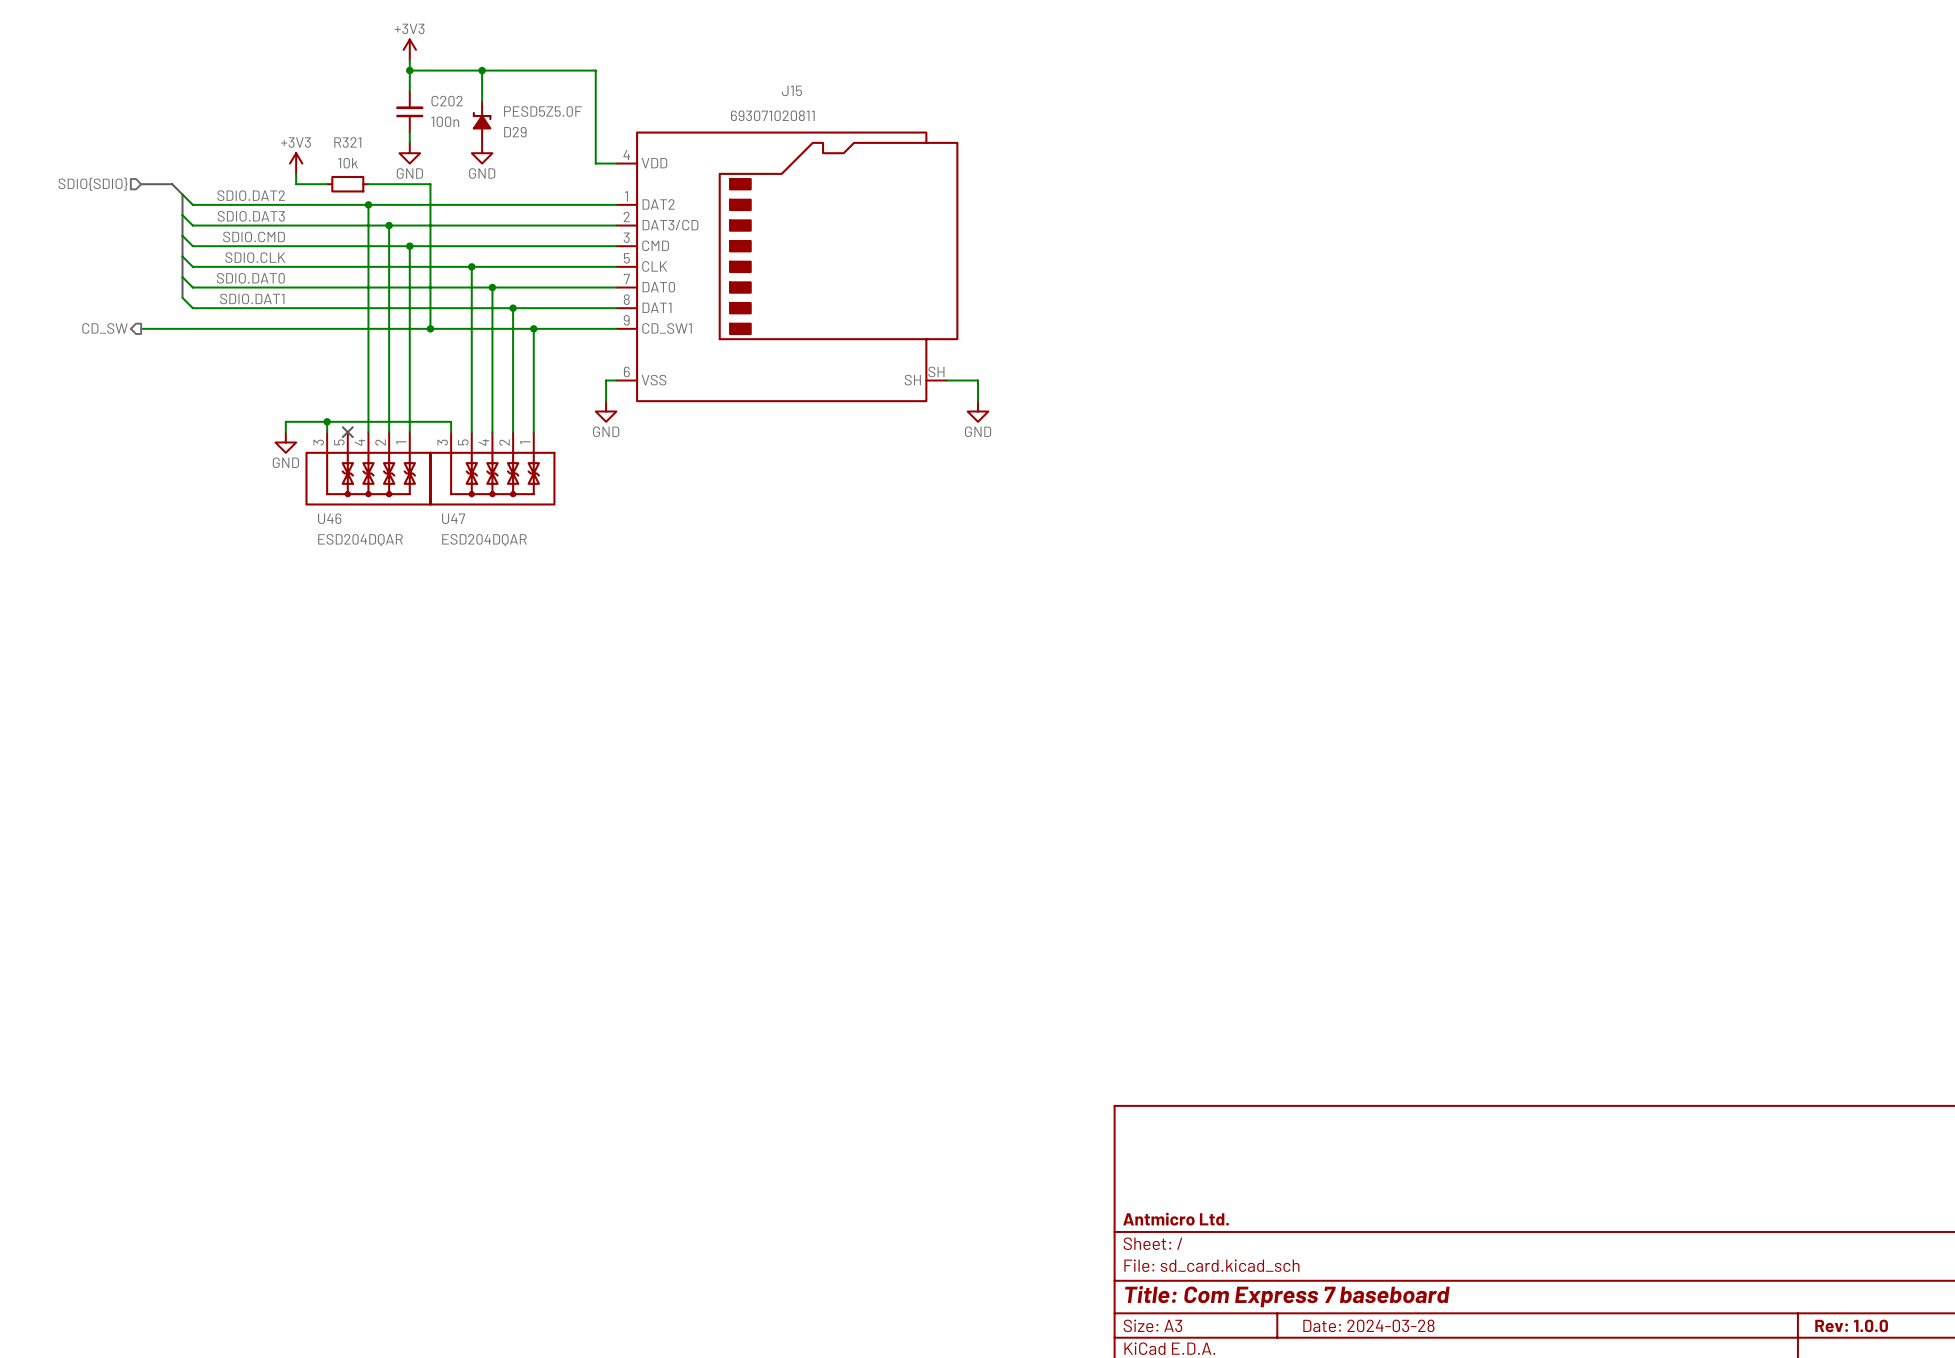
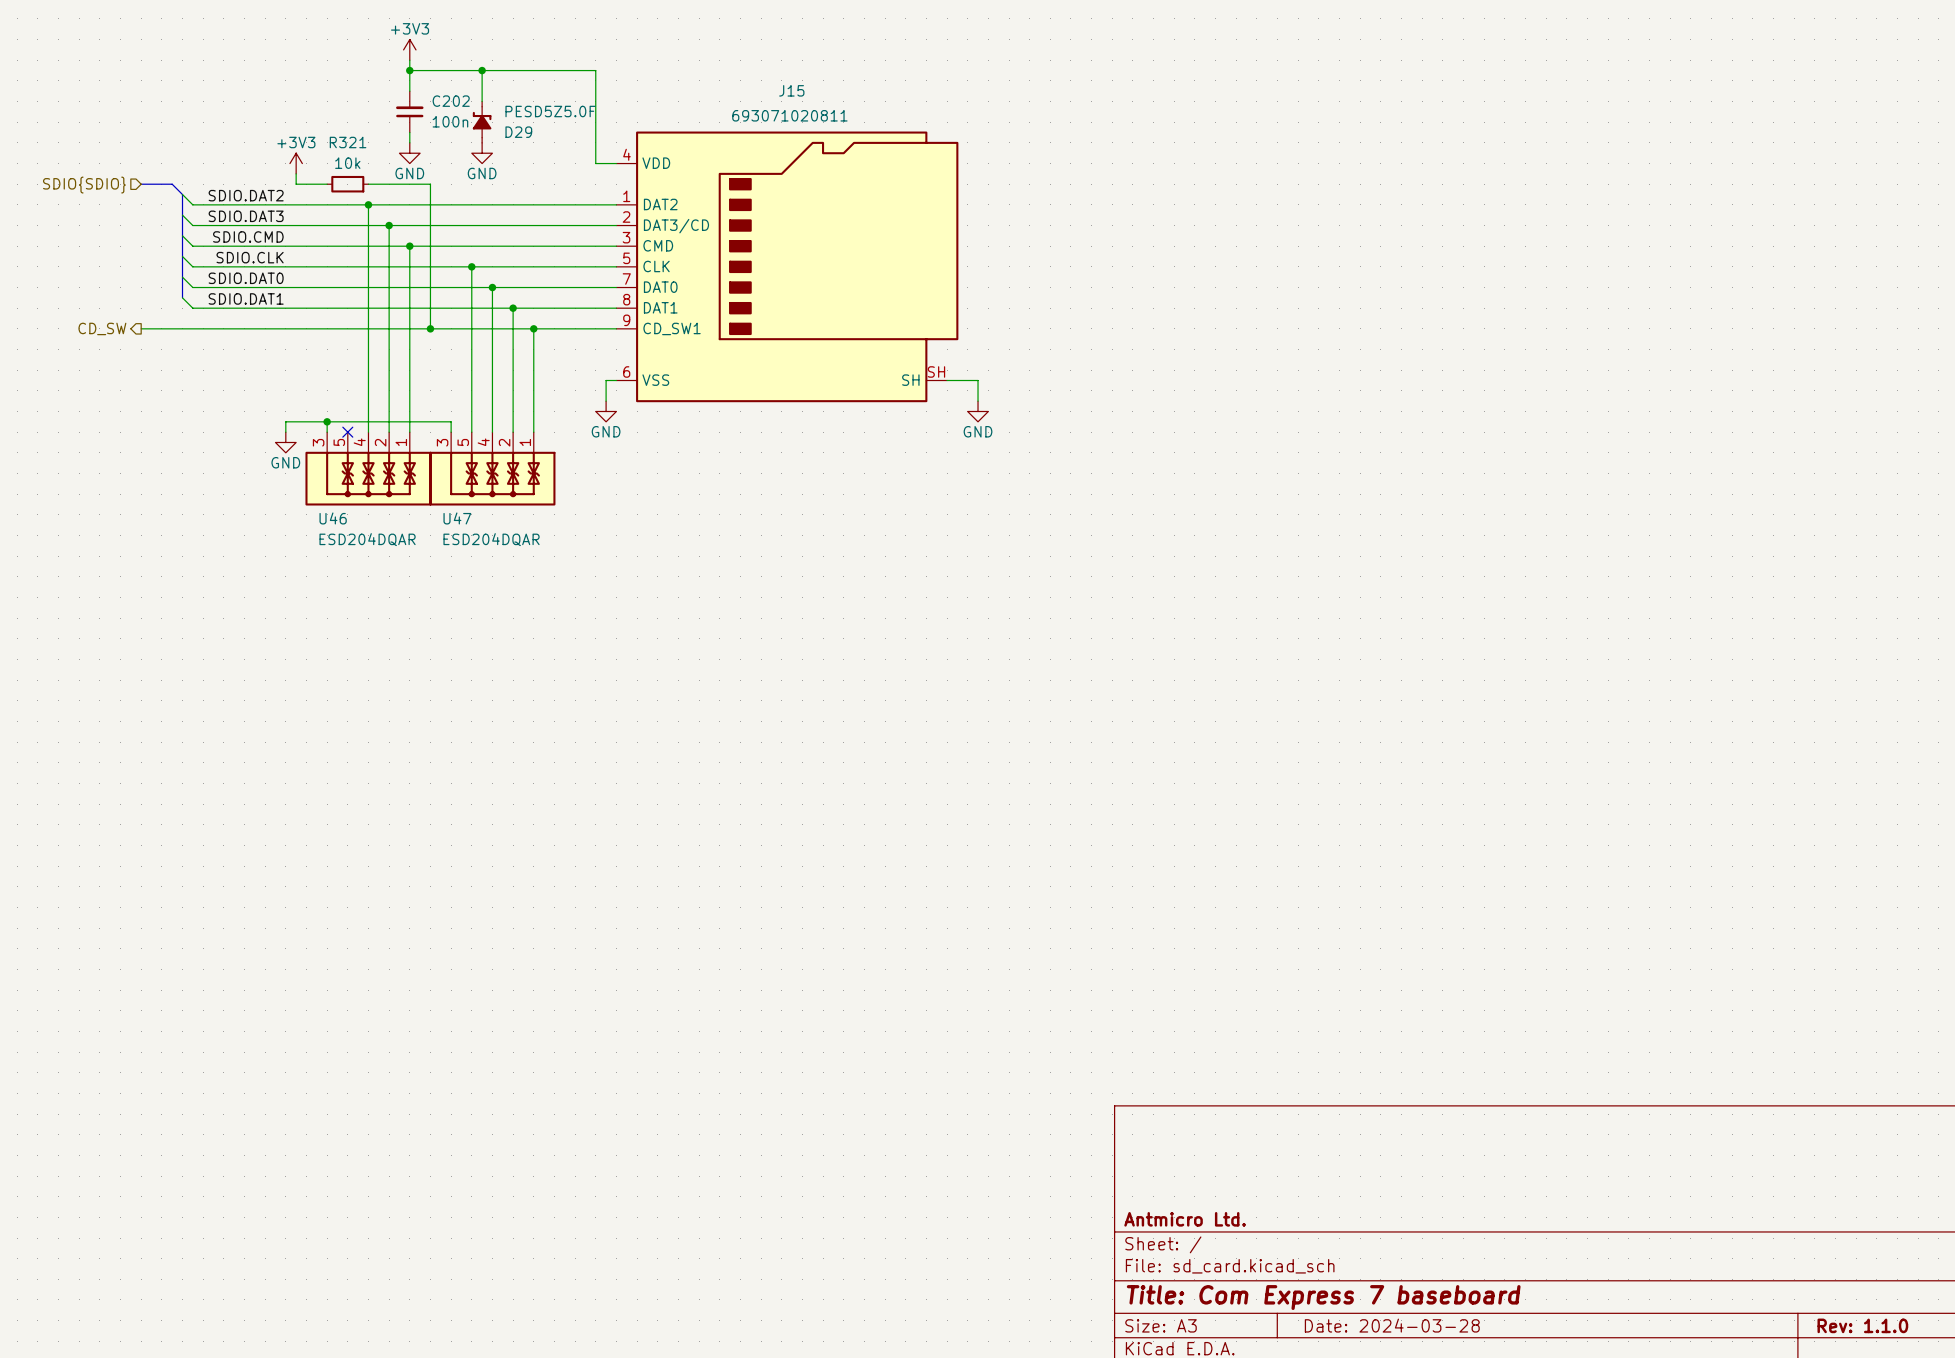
title block: Rev: 1.0.0 (1851, 1325) -> Rev: 1.1.0 (1862, 1325)

